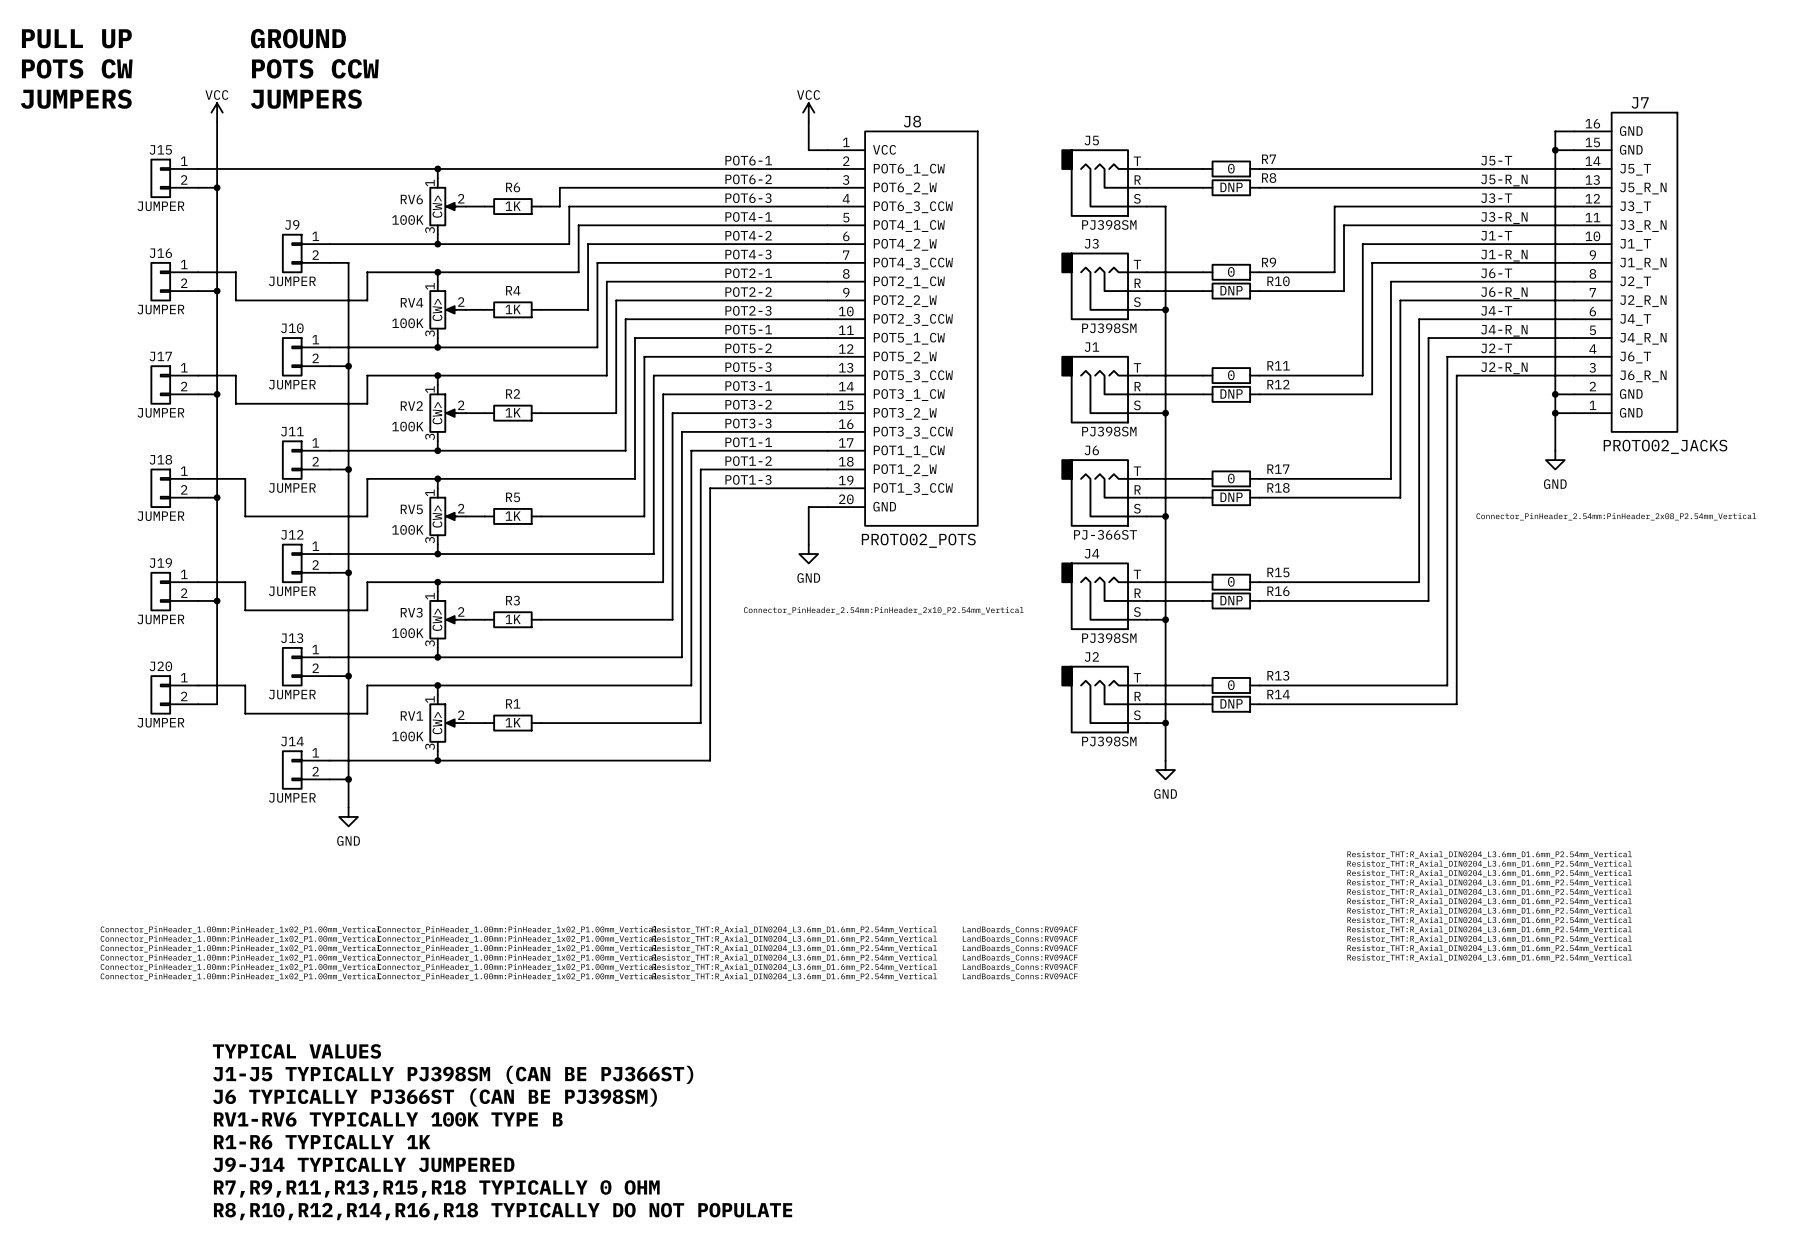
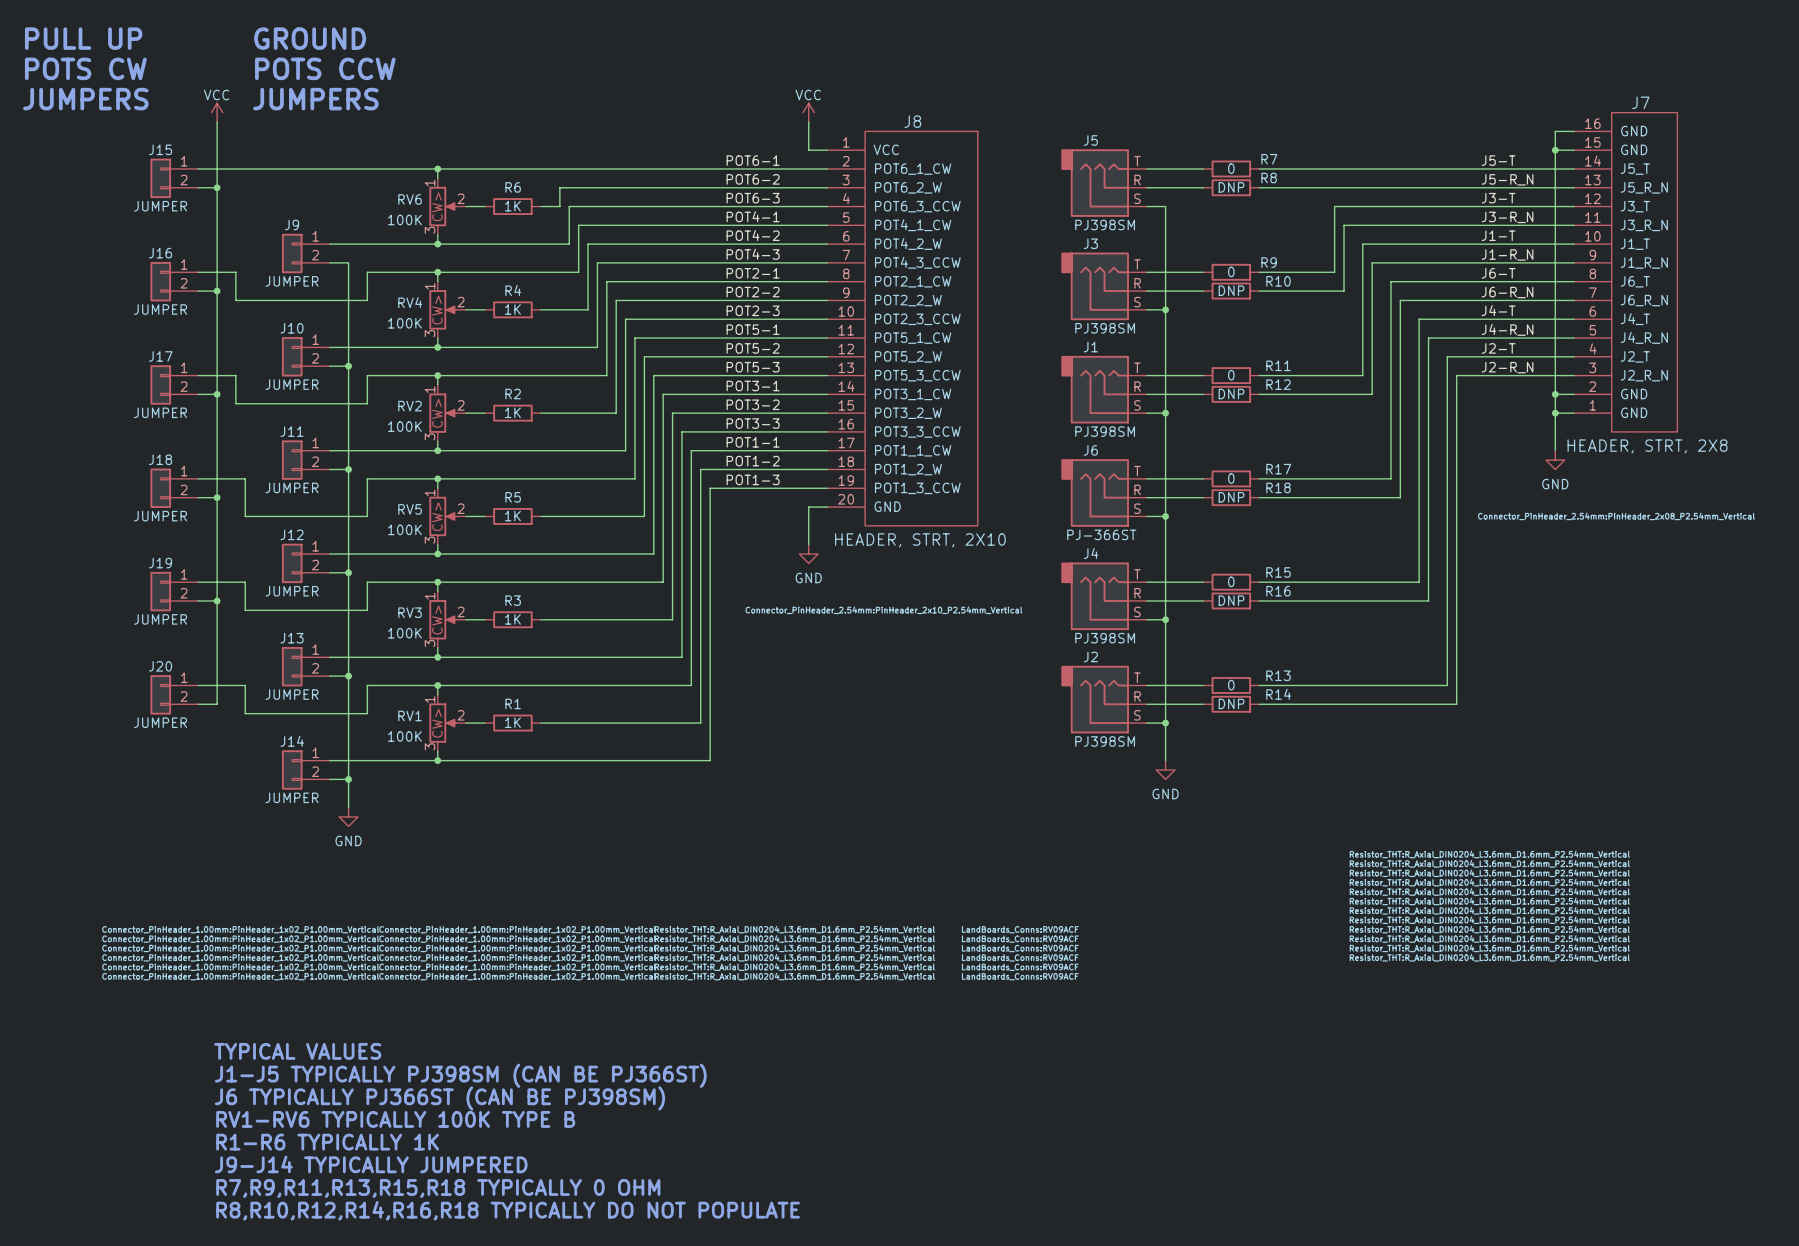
J7 pin name: J2_T (1635, 282) -> J6_T (1635, 281)
J7 pin name: J2_R_N (1643, 301) -> J6_R_N (1644, 300)
J7 pin name: J6_T (1635, 357) -> J2_T (1635, 356)
J7 pin name: J6_R_N (1643, 376) -> J2_R_N (1644, 375)
J7 value: PROTO02_JACKS (1665, 446) -> HEADER, STRT, 2X8 (1647, 446)
J8 value: PROTO02_POTS (918, 540) -> HEADER, STRT, 2X10 (920, 540)

